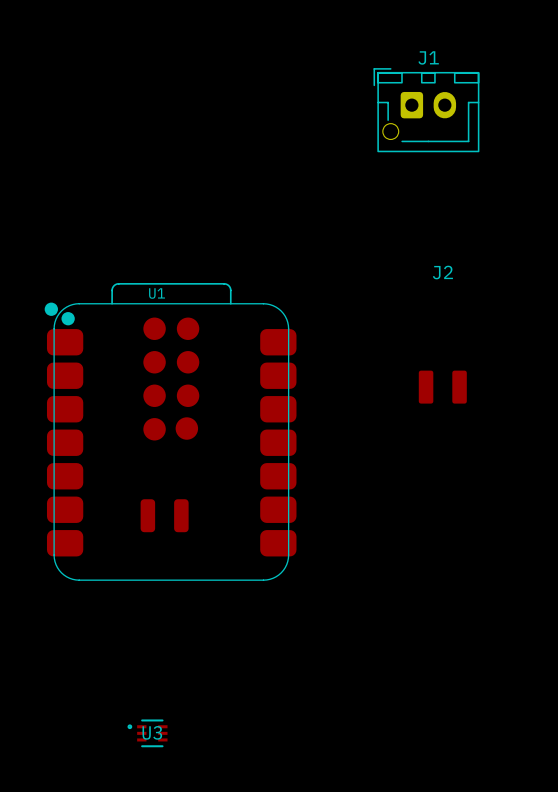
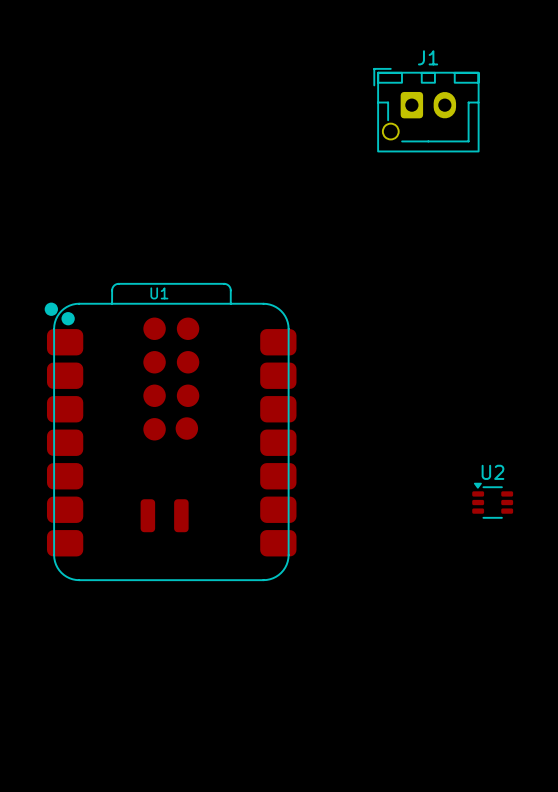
J2: (442, 387) -> none
U2: none -> (492, 500)
U3: (147, 733) -> none

